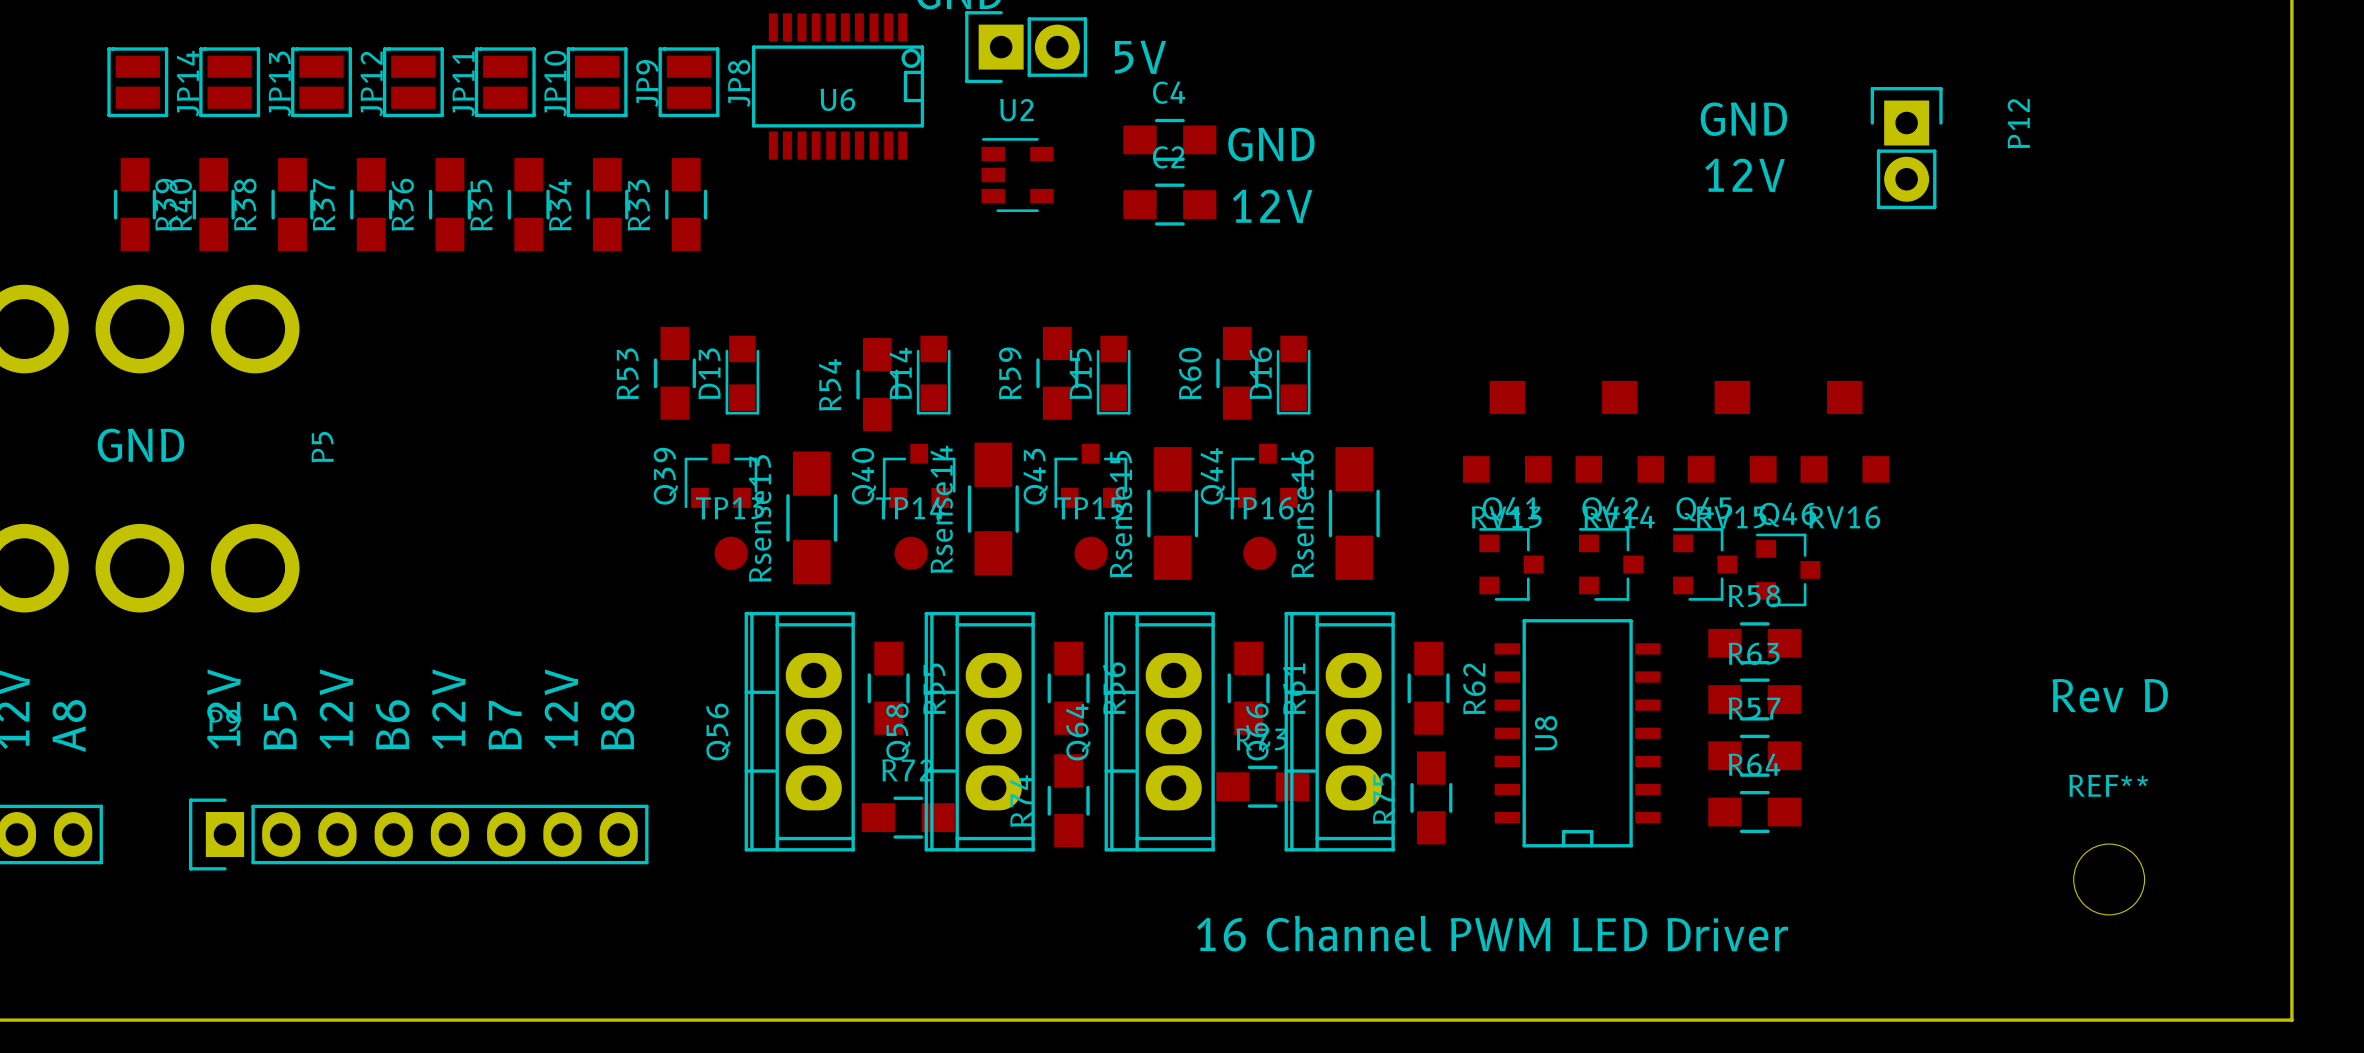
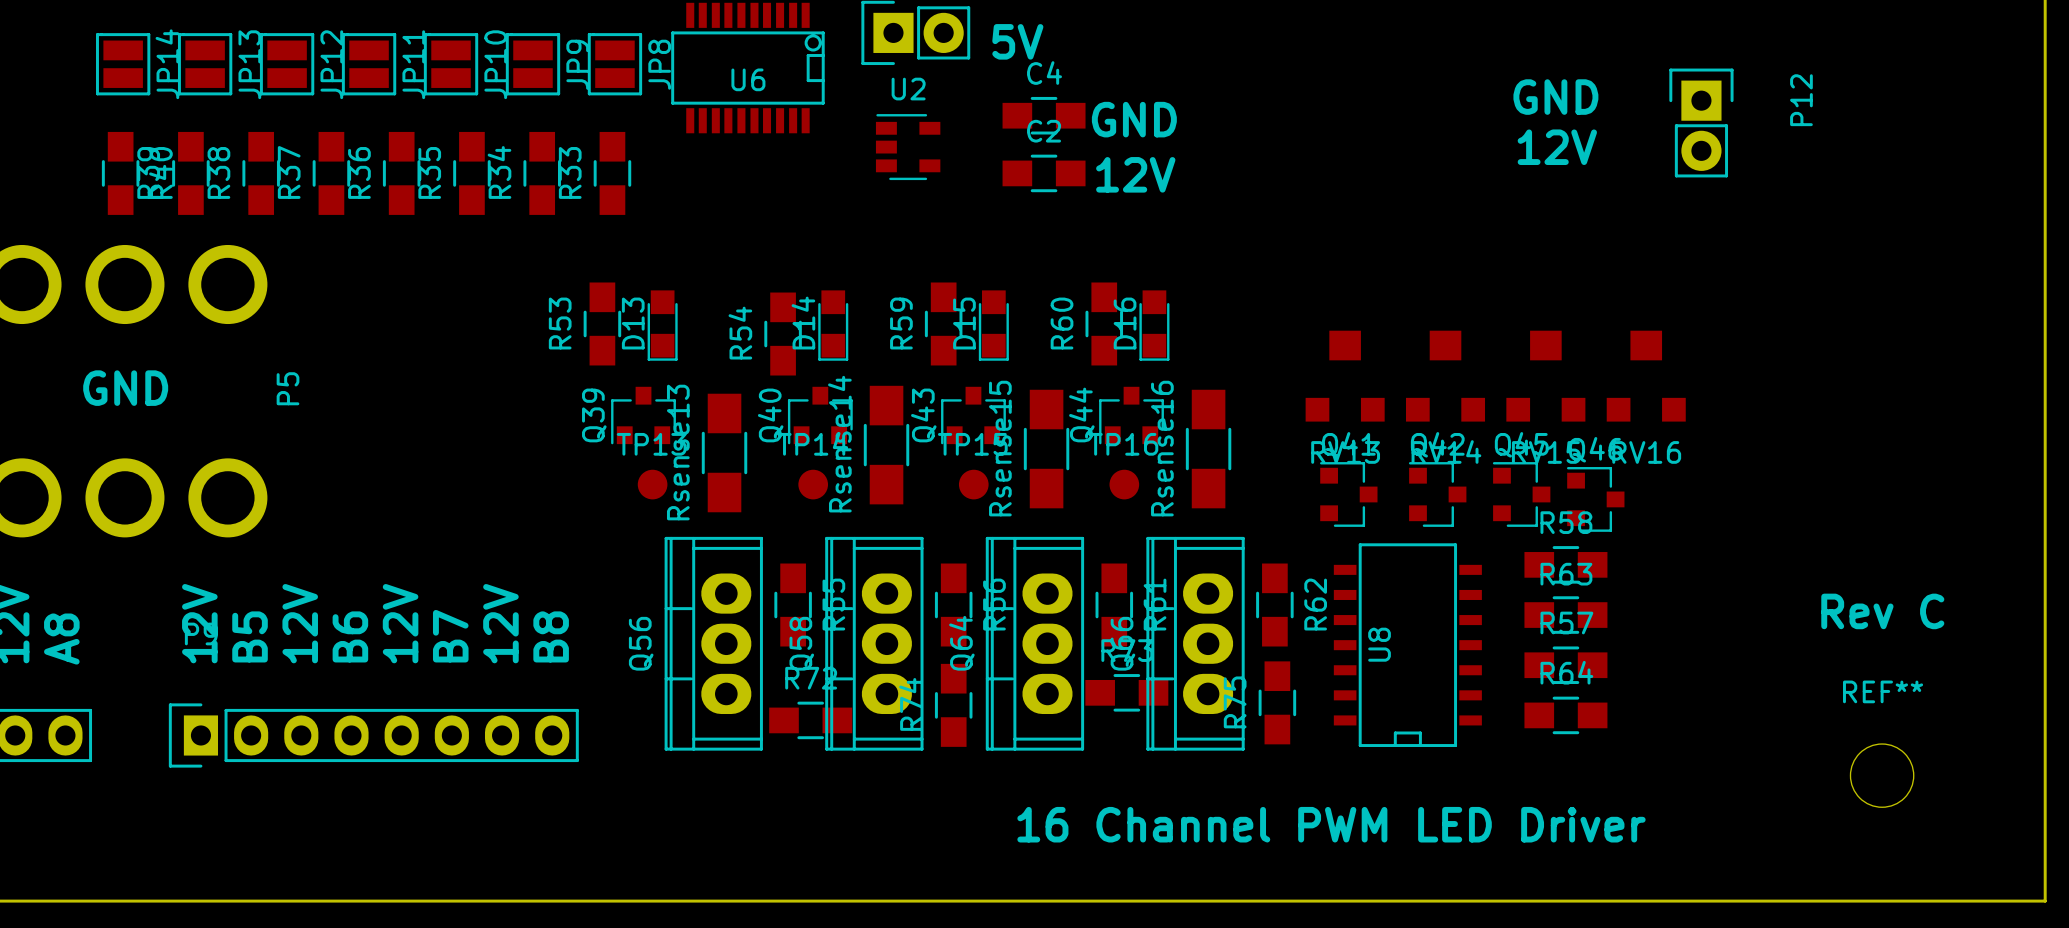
text: Rev D (2110, 695) -> Rev C (1882, 611)

